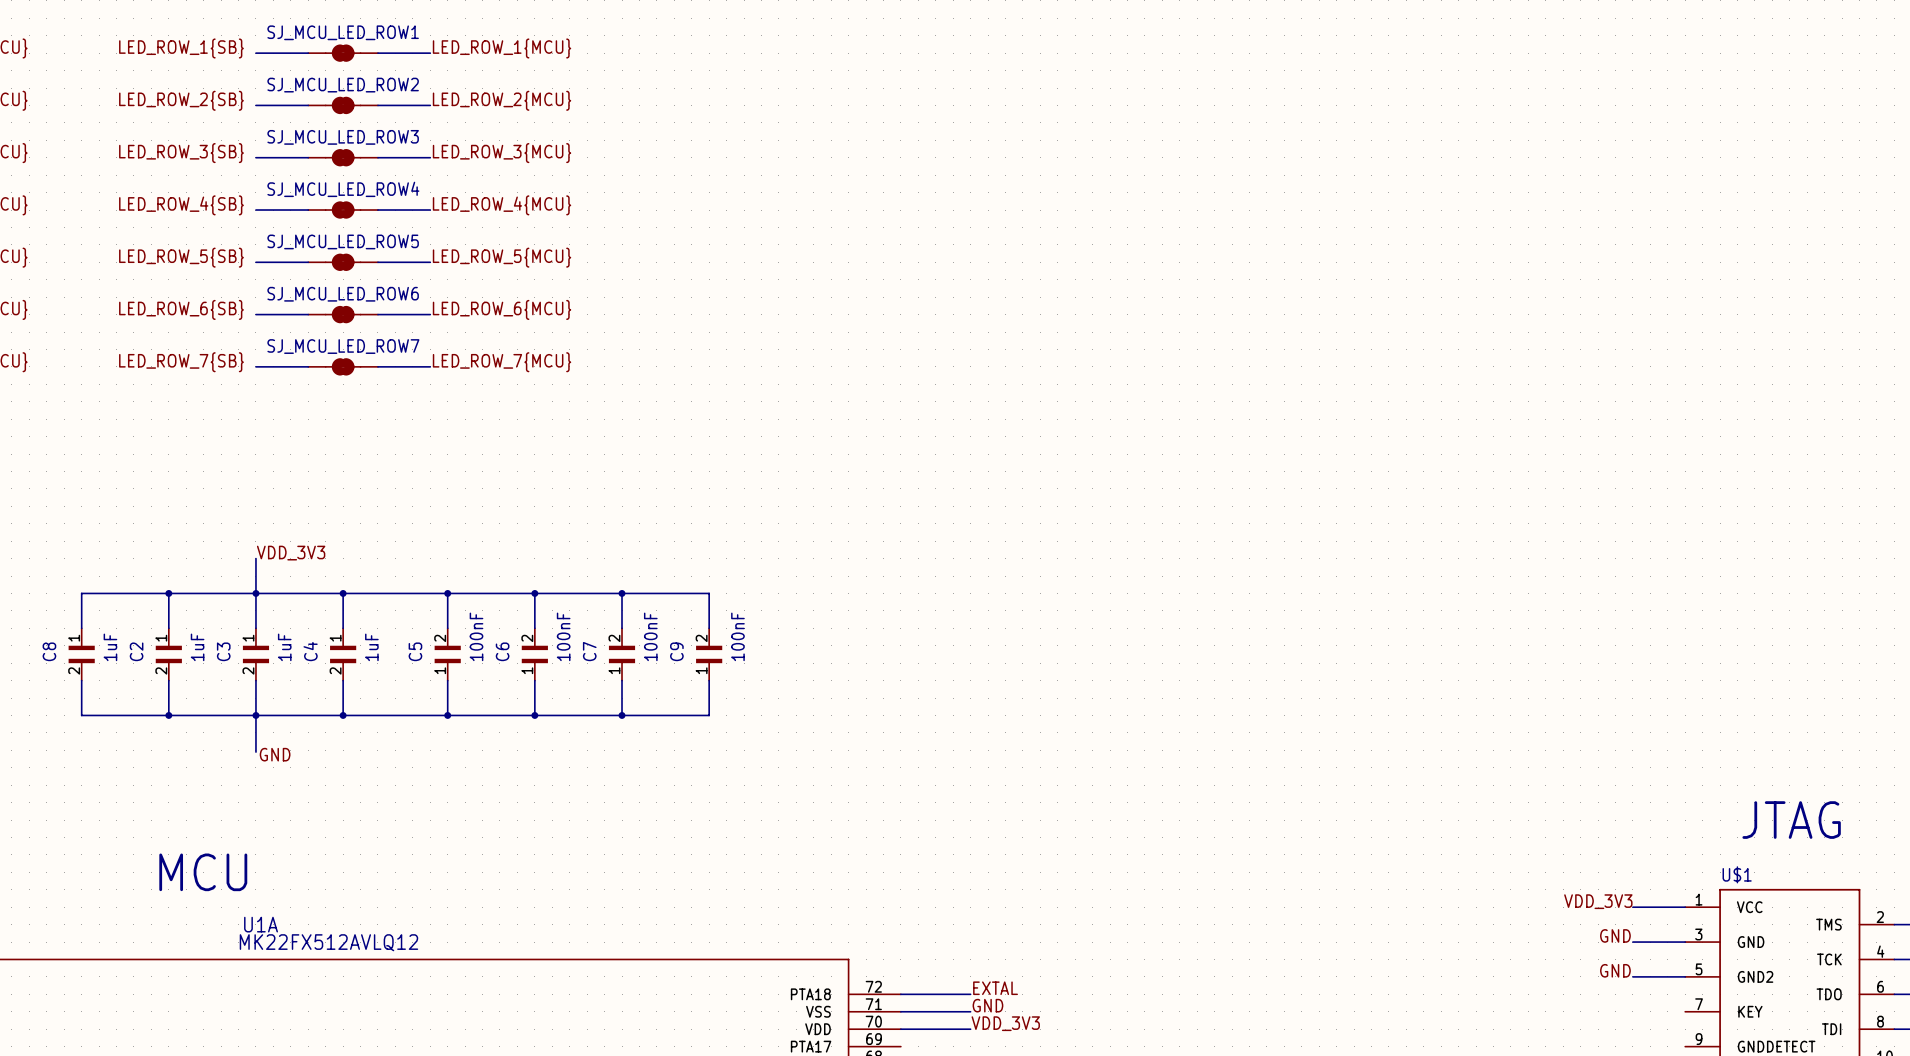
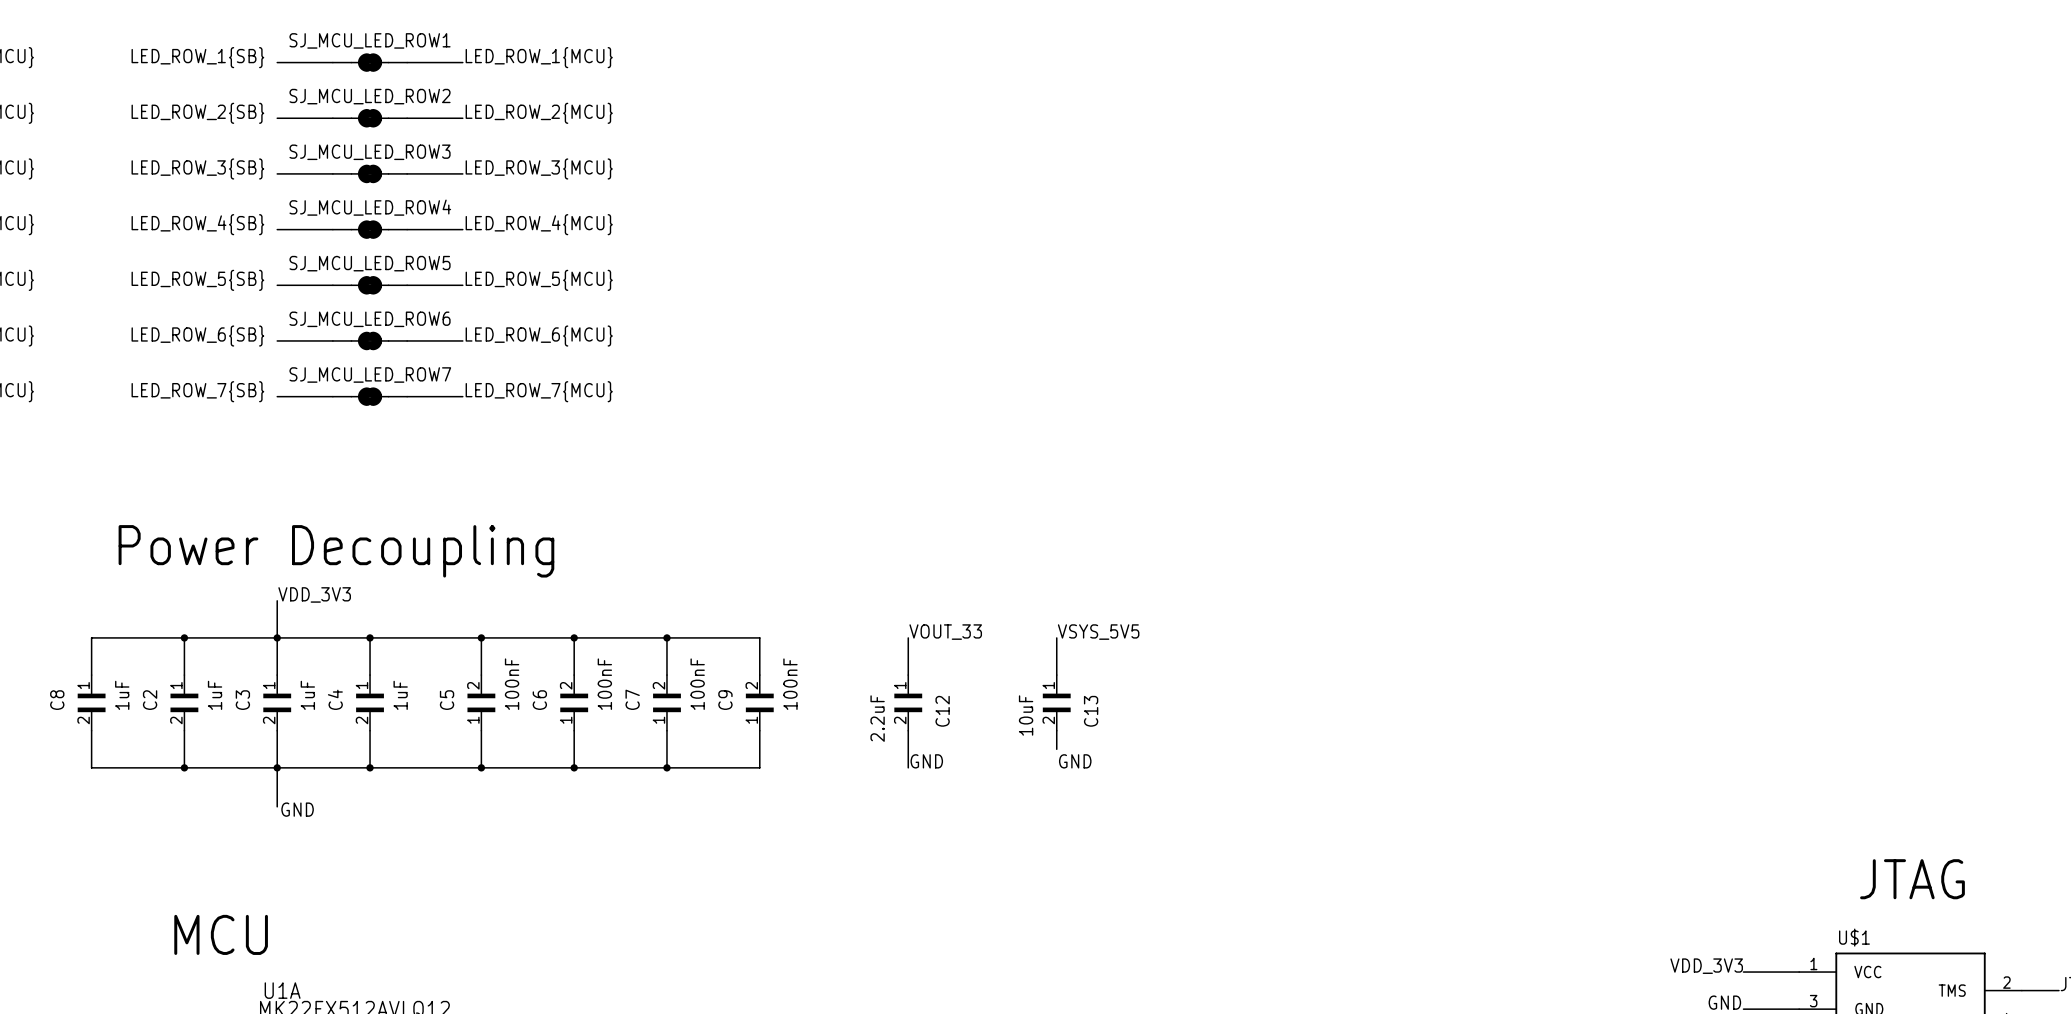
text: none -> Power Decoupling (336, 551)
label: none -> VOUT_33 (945, 632)
label: none -> VSYS_5V5 (1098, 632)
wire: none -> (908, 637) (908, 675)
wire: none -> (1056, 637) (1056, 675)
C12: none -> 2.2uF (908, 702)
C13: none -> 10uF (1056, 702)
wire: none -> (908, 730) (908, 767)
wire: none -> (1056, 730) (1056, 749)
label: none -> GND (926, 761)
label: none -> GND (1075, 761)

